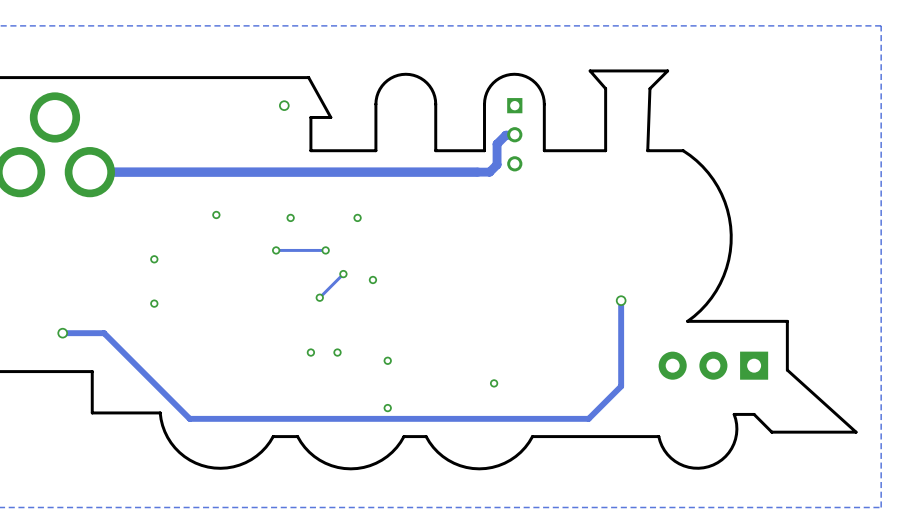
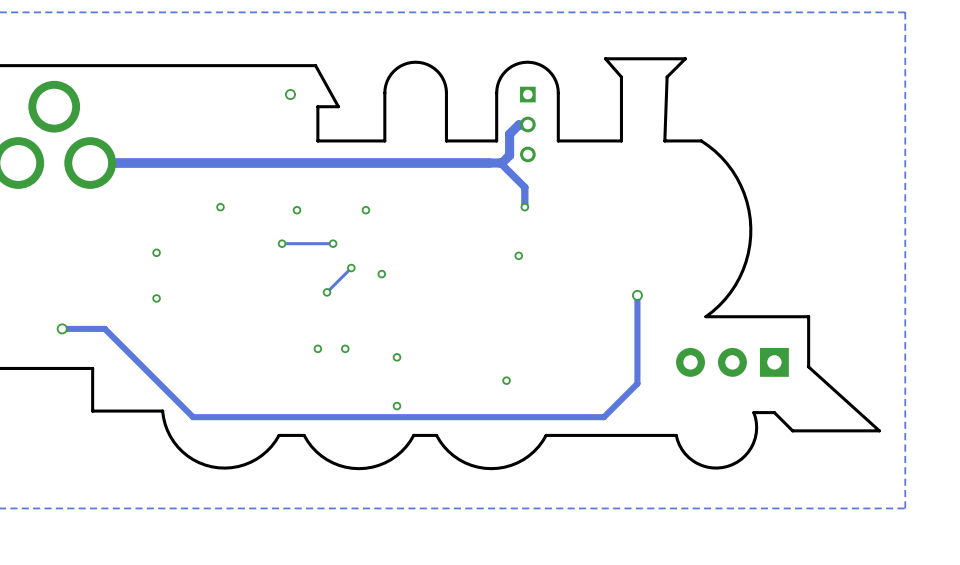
track: none -> (500, 163) (524, 187) (524, 207)
via: none -> (524, 207)
via: none -> (518, 255)

